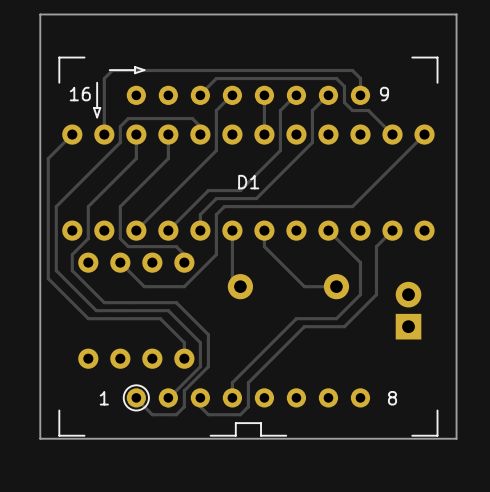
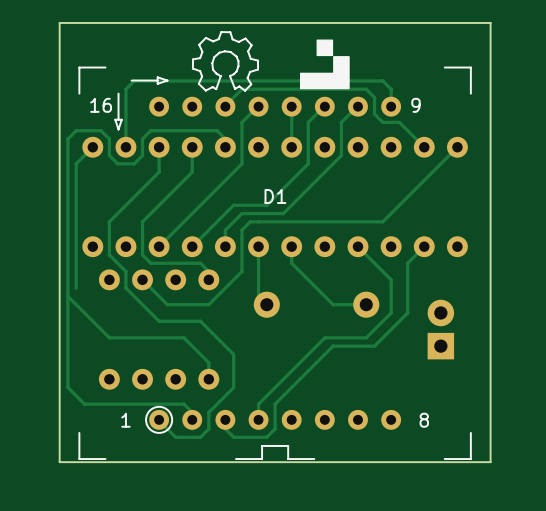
drawing: none -> [191, 31, 259, 92]
drawing: none -> [299, 39, 350, 90]
track: (56, 150) (48, 158) -> (76, 163) (76, 221)
track: (112, 150) (56, 206) -> (134, 163) (117, 163) (109, 155) (109, 138) (101, 130) (76, 130) (67, 138) (67, 172)
track: (88, 238) (72, 254) (72, 270) (104, 302) (136, 302) -> (109, 254) (125, 271) (125, 288) (159, 321)
track: (56, 270) (96, 310) (168, 310) (200, 342) (200, 366) (169, 397) -> none
track: none -> (67, 296) (67, 387) (84, 404) (183, 404) (192, 412) (192, 419)

